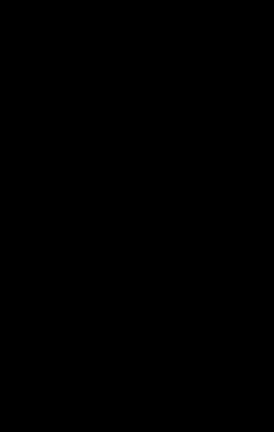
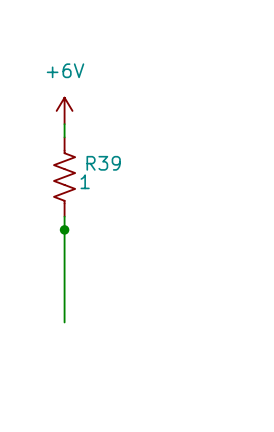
power symbol: none -> +6V (64, 110)
wire: none -> (64, 124) (64, 137)
R39: none -> 1 (64, 177)
wire: none -> (64, 216) (64, 322)
junction: none -> (64, 229)

